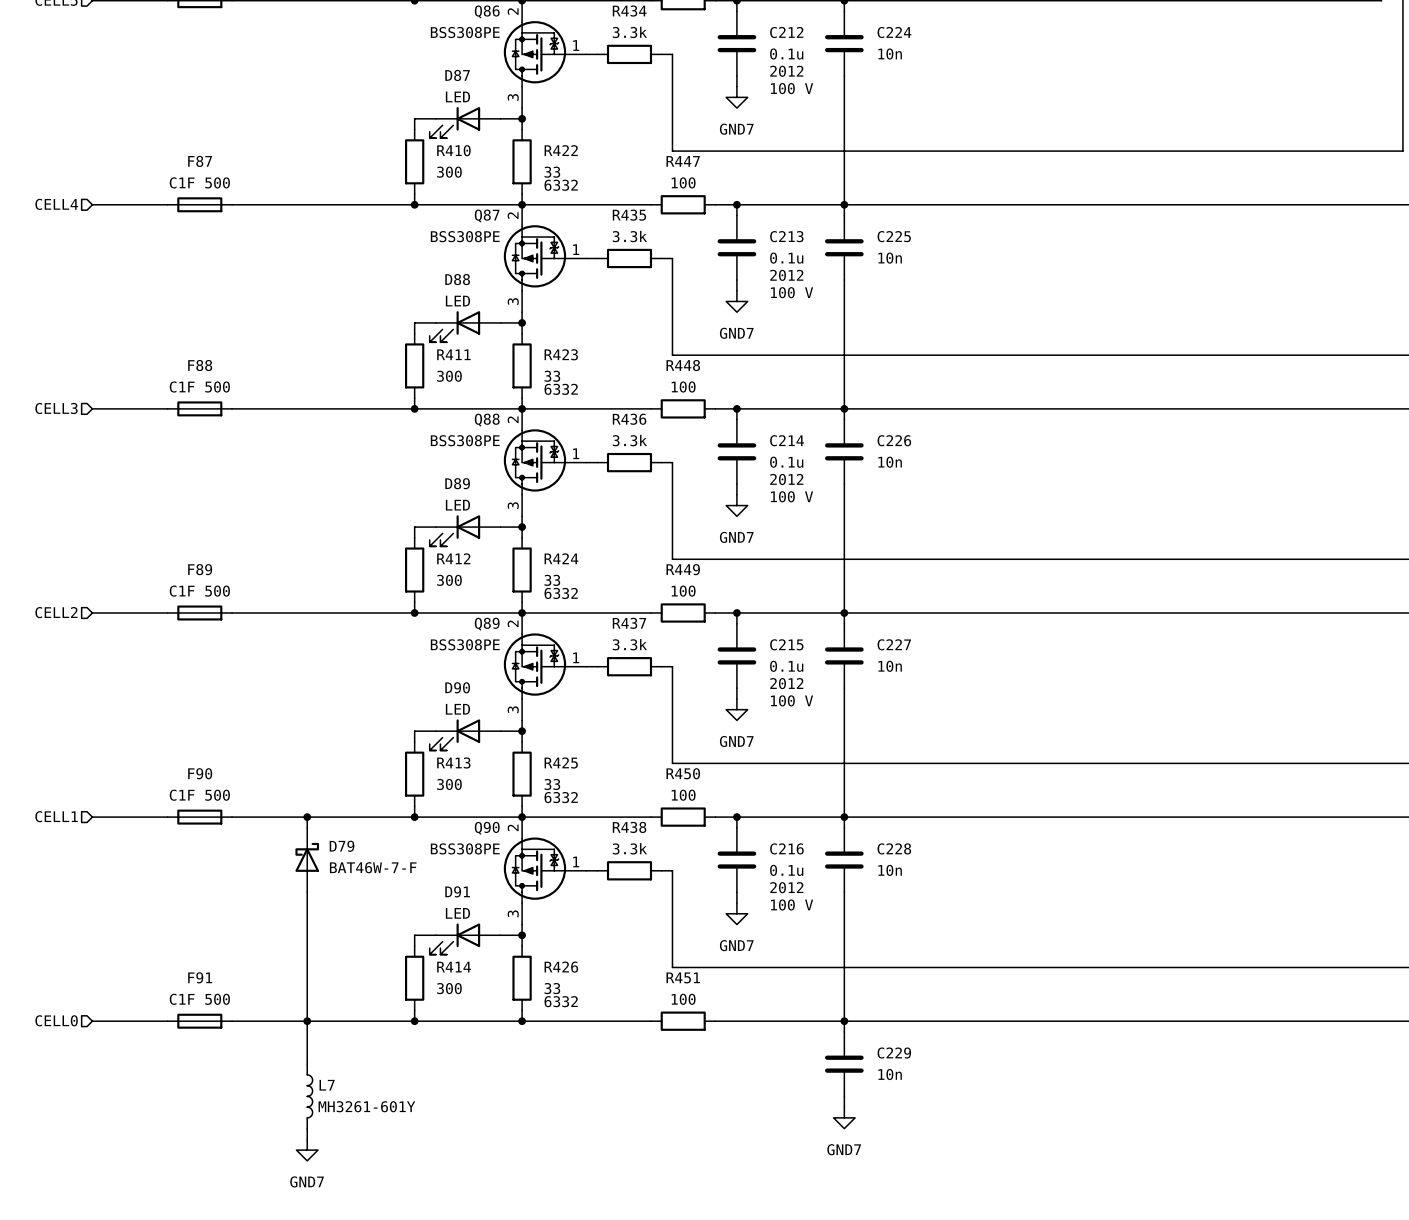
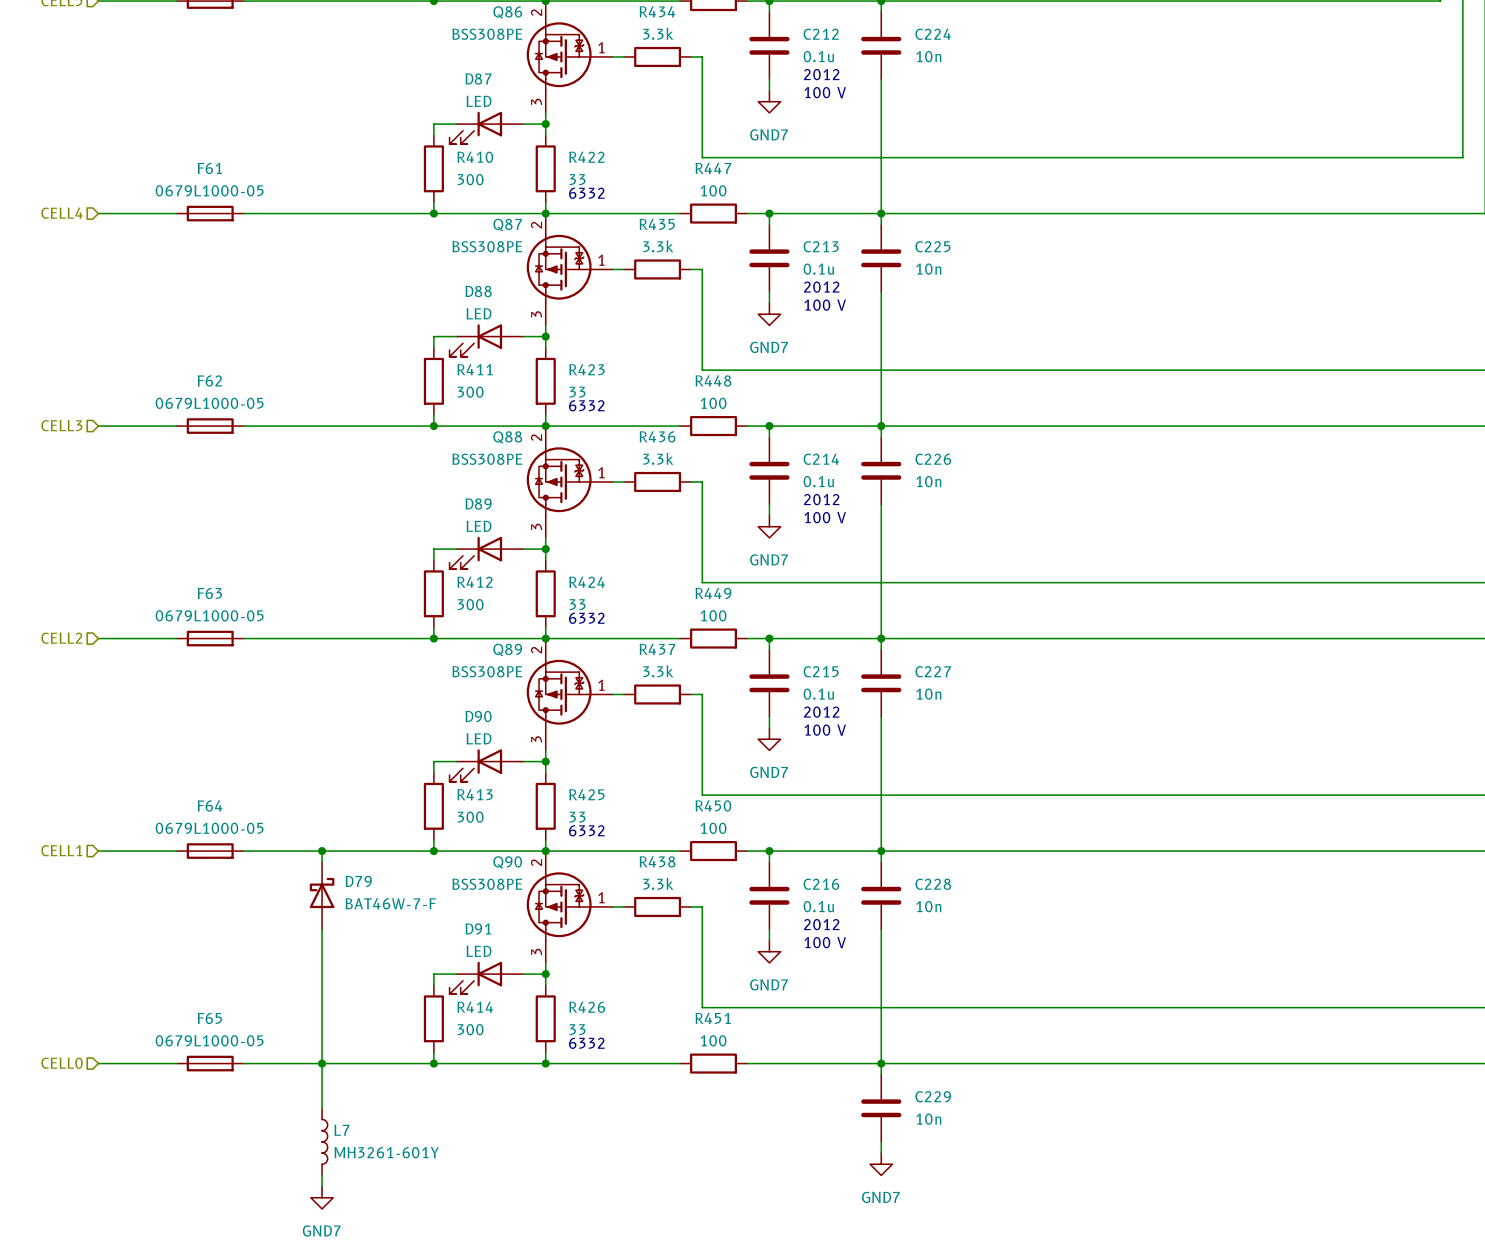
F87 name: F87 (200, 161) -> F61 (209, 168)
F87 value: C1F 500 (199, 182) -> 0679L1000-05 (209, 190)
F88 name: F88 (200, 365) -> F62 (209, 380)
F88 value: C1F 500 (199, 387) -> 0679L1000-05 (209, 403)
F89 name: F89 (200, 569) -> F63 (209, 593)
F89 value: C1F 500 (199, 591) -> 0679L1000-05 (209, 615)
F90 name: F90 (200, 773) -> F64 (210, 805)
F90 value: C1F 500 (199, 795) -> 0679L1000-05 (209, 828)
F91 name: F91 (200, 977) -> F65 (209, 1018)
F91 value: C1F 500 (199, 999) -> 0679L1000-05 (209, 1040)

